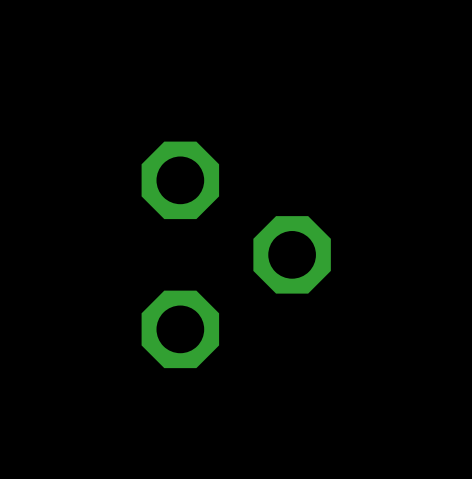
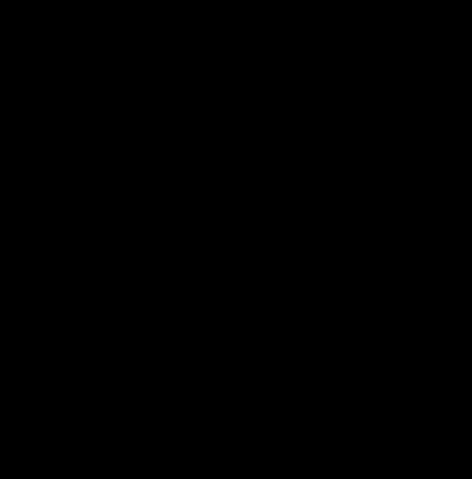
part: (236, 254) -> none

